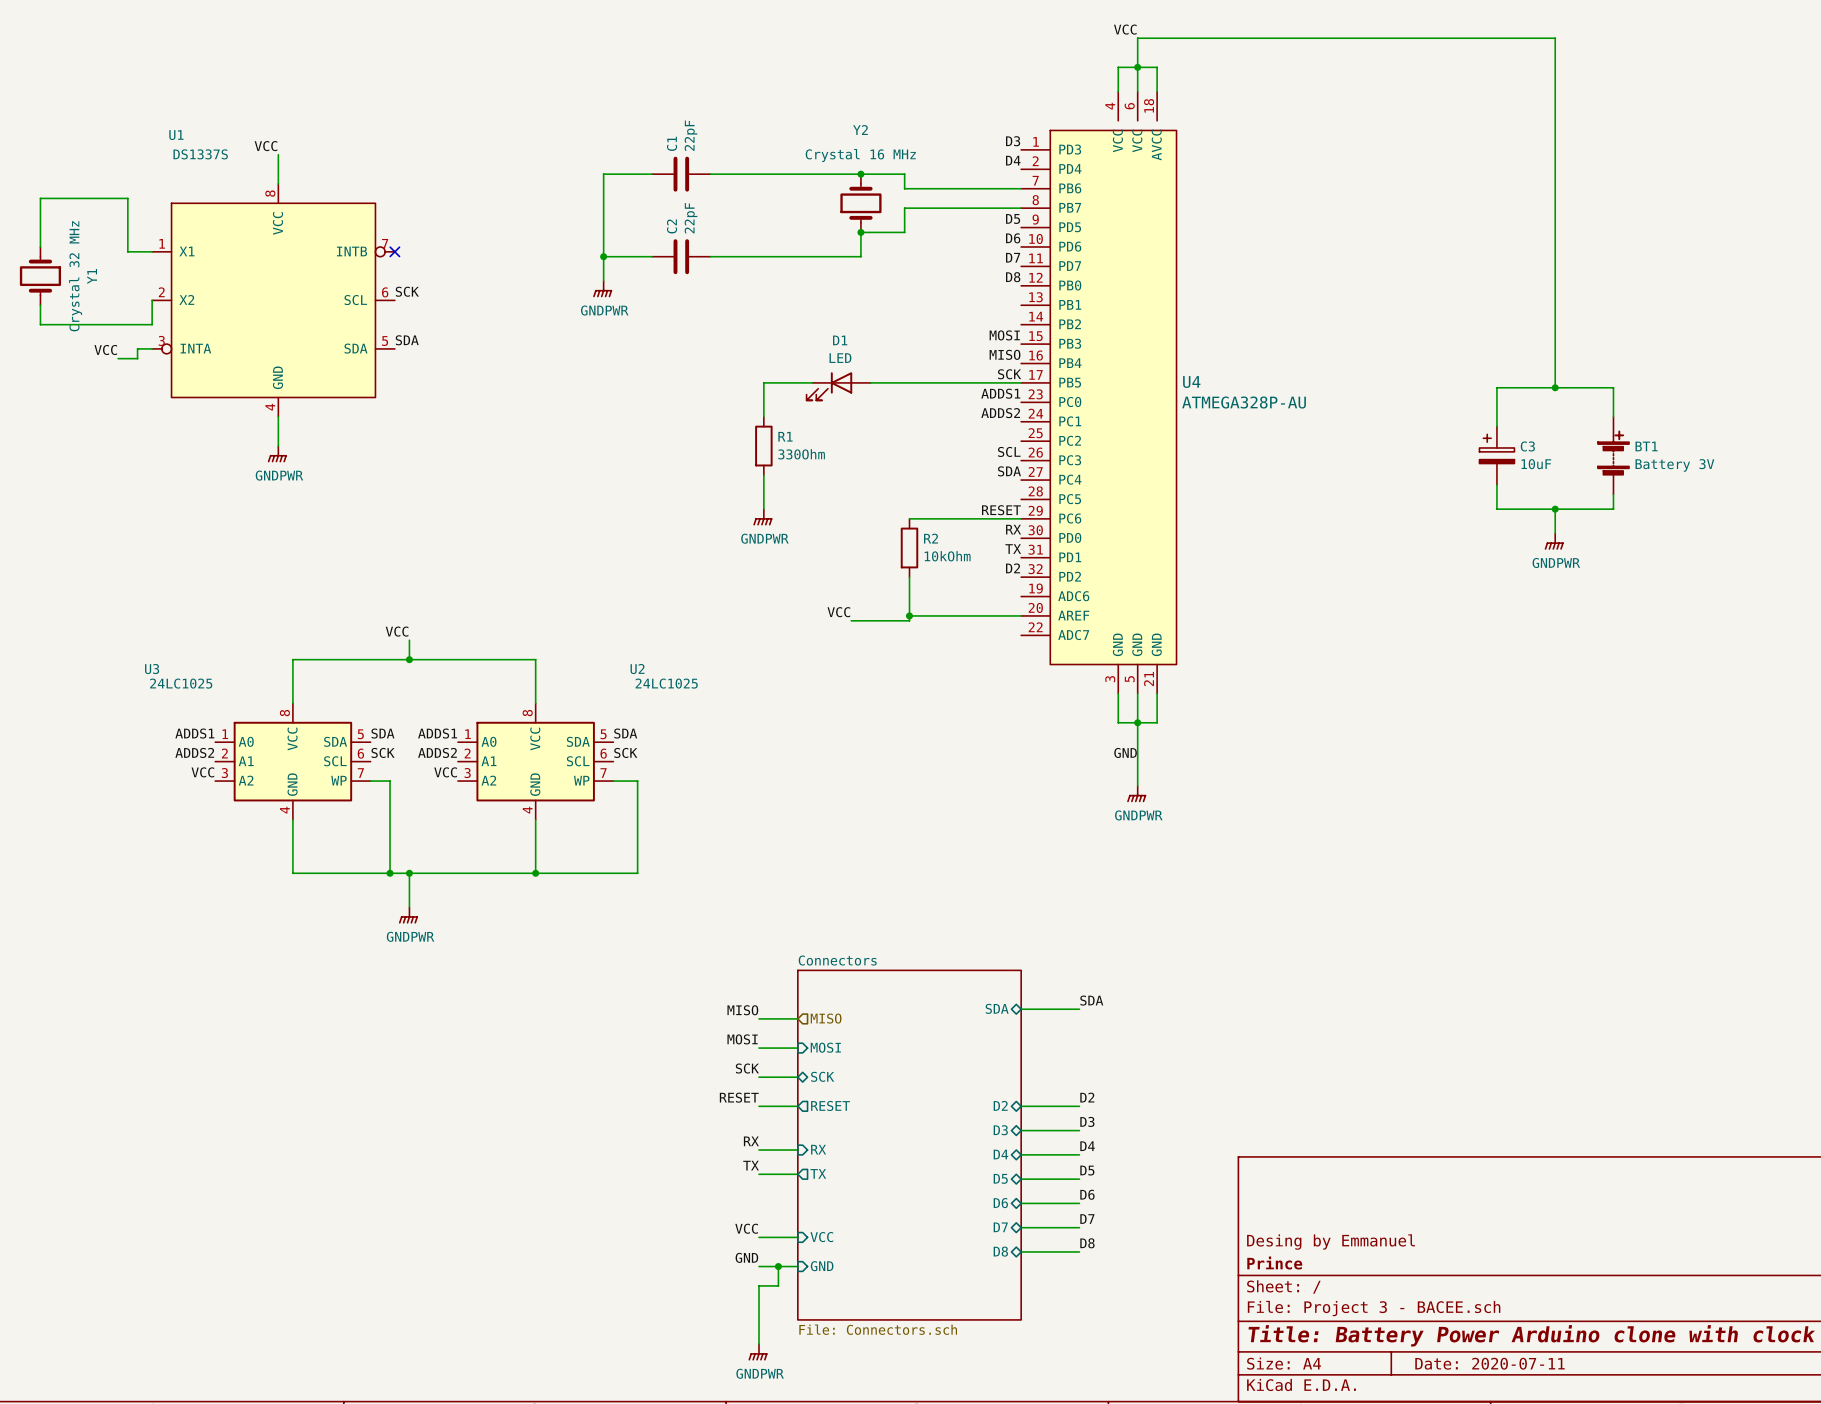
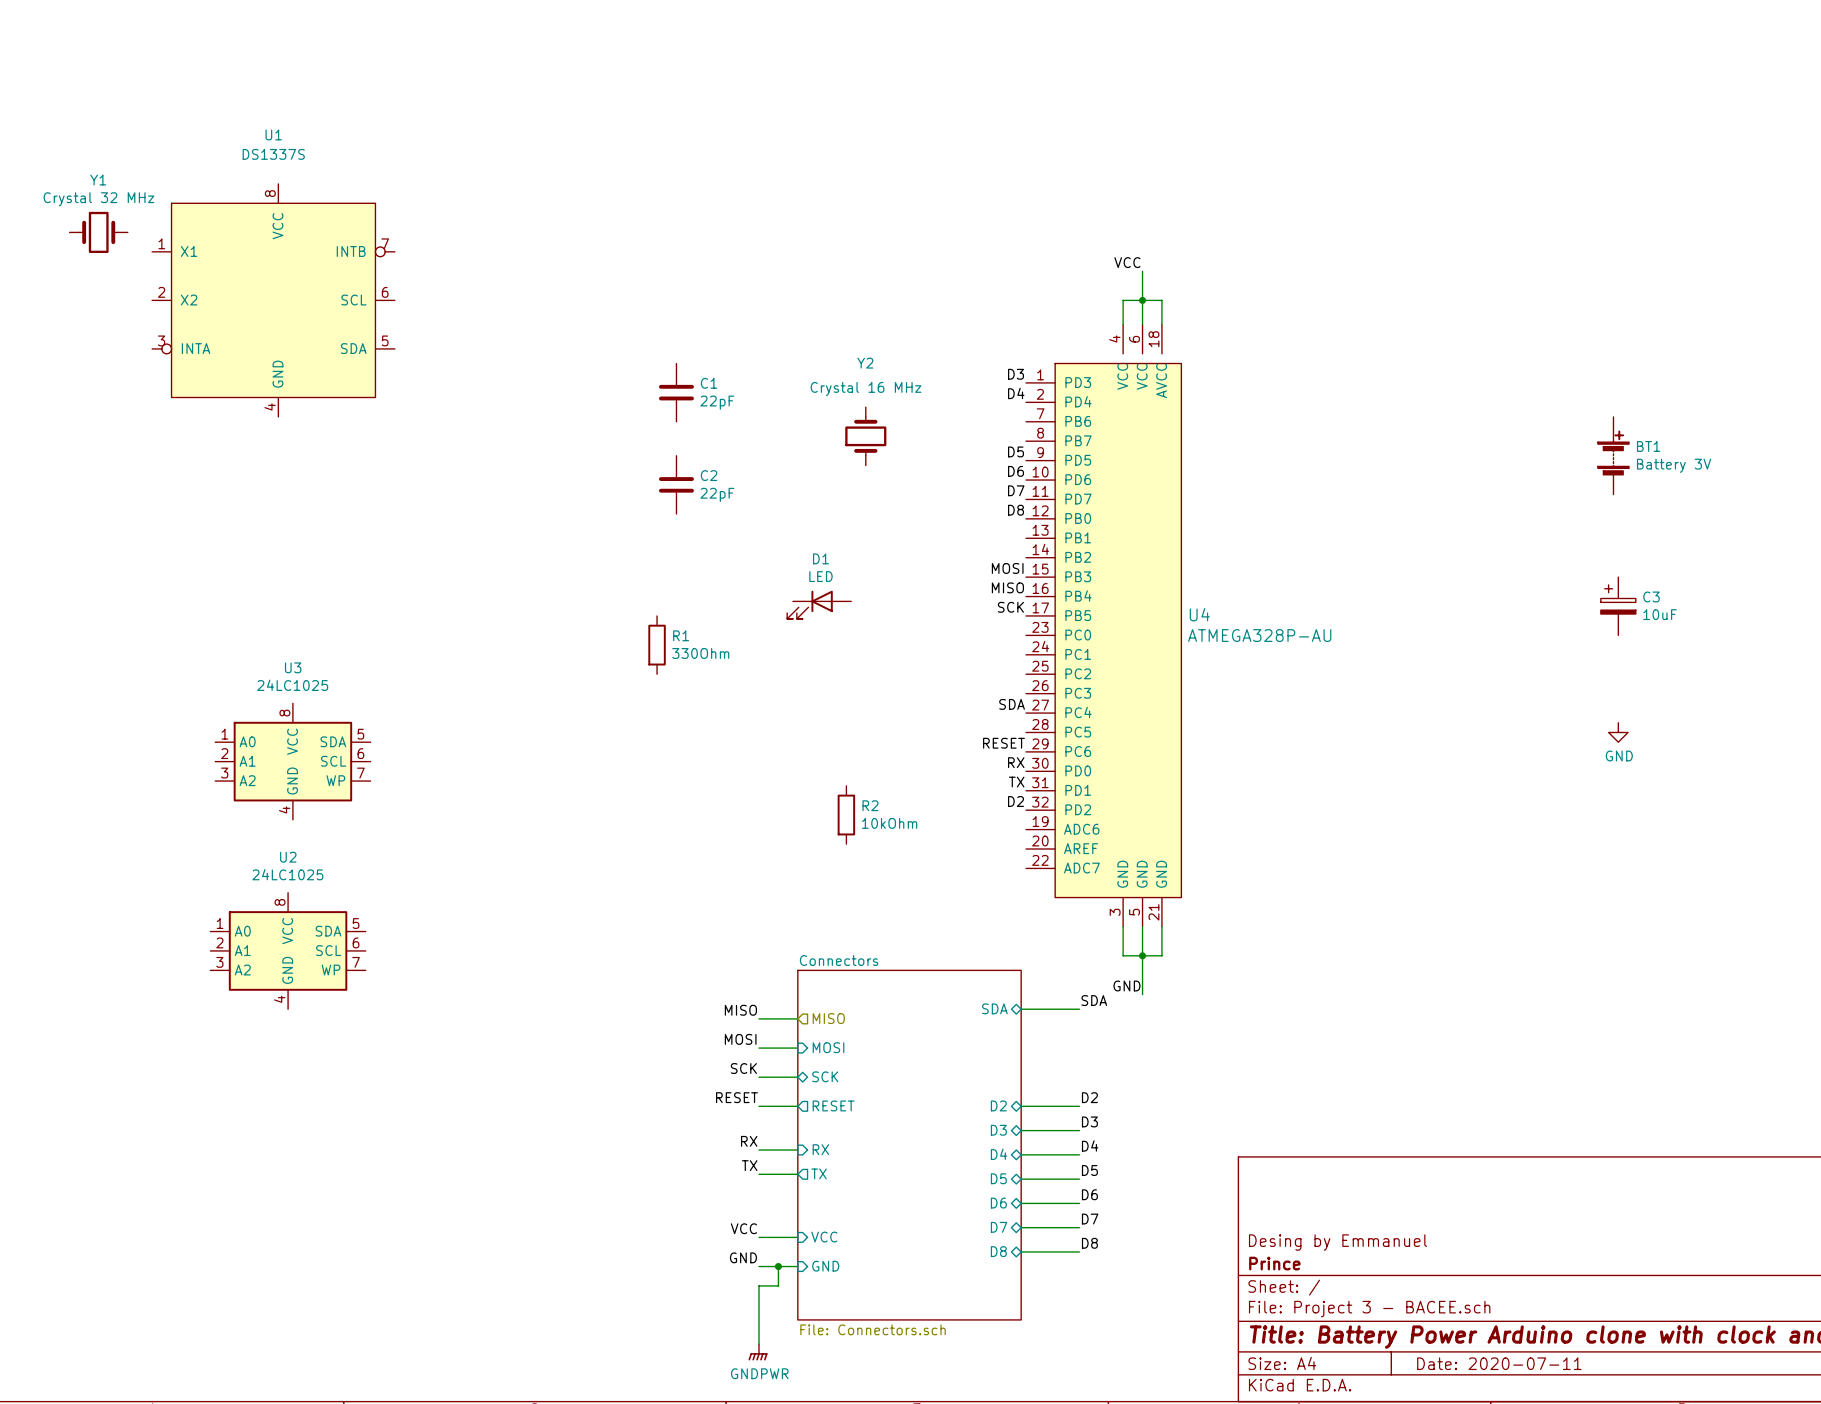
label: VCC (1125, 29) -> none
junction: (1137, 67) -> none
wire: (1118, 91) (1118, 67) (1157, 67) (1157, 91) -> none
wire: (1137, 91) (1137, 38) (1555, 38) (1555, 387) -> none
U1 name position: U1 (176, 135) -> U1 (273, 134)
label: D3 (1013, 141) -> none
label: VCC (265, 146) -> none
U1 value position: DS1337S (200, 154) -> DS1337S (273, 154)
wire: (278, 154) (278, 183) -> none
label: D4 (1013, 160) -> none
wire: (652, 174) (603, 174) (603, 280) -> none
C1 rotation: 0° (681, 174) -> 90° clockwise (676, 392)
C1 position: (681, 174) -> (676, 392)
wire: (710, 174) (904, 174) (904, 188) (1021, 188) -> none
junction: (860, 174) -> none
Y2 position: (860, 203) -> (865, 436)
wire: (1021, 208) (904, 208) (904, 232) (860, 232) (860, 256) (710, 256) -> none
label: D5 (1013, 219) -> none
junction: (860, 232) -> none
label: D6 (1013, 238) -> none
wire: (40, 246) (40, 198) (127, 198) (127, 251) (152, 251) -> none
no-connect mark: (394, 251) -> none
wire: (603, 256) (652, 256) -> none
junction: (603, 256) -> none
C2 rotation: 0° (681, 256) -> 90° clockwise (676, 484)
C2 position: (681, 256) -> (676, 484)
label: D7 (1013, 257) -> none
label: none -> VCC (1127, 262)
Y1 rotation: 0° (40, 276) -> 90° clockwise (98, 232)
Y1 position: (40, 276) -> (98, 232)
Y1 value position: Crystal 32 MHz (75, 276) -> Crystal 32 MHz (98, 199)
Y1 name position: Y1 (92, 276) -> Y1 (98, 180)
label: D8 (1013, 277) -> none
power symbol: GNDPWR (602, 289) -> none
label: SCK (407, 291) -> none
wire: (152, 300) (152, 324) (40, 324) (40, 305) -> none
junction: none -> (1142, 300)
label: MOSI (1004, 335) -> none
label: SDA (407, 340) -> none
wire: (152, 348) (137, 348) (137, 358) (118, 358) -> none
label: VCC (105, 349) -> none
label: MISO (1005, 354) -> none
label: SCK (1009, 374) -> D3 (1016, 374)
wire: (812, 382) (763, 382) (763, 416) -> none
wire: (870, 382) (1021, 382) -> none
D1 position: (838, 386) -> (819, 604)
junction: (1555, 387) -> none
U4 position: (1098, 392) -> (1103, 625)
label: ADDS1 (1000, 393) -> D4 (1016, 393)
label: ADDS2 (1000, 413) -> none
wire: (278, 416) (278, 446) -> none
wire: (1613, 416) (1613, 387) (1496, 387) (1496, 426) -> none
R1 position: (763, 446) -> (657, 645)
label: SCL (1009, 451) -> D5 (1016, 451)
power symbol: GNDPWR (277, 454) -> none
C3 position: (1496, 455) -> (1618, 606)
label: SDA (1009, 471) -> D6 (1016, 471)
wire: (763, 475) (763, 509) -> none
wire: (1496, 484) (1496, 509) (1613, 509) (1613, 494) -> none
label: none -> D7 (1016, 490)
wire: (1555, 509) (1555, 533) -> none
junction: (1555, 509) -> none
label: RESET (1001, 510) -> D8 (1016, 510)
power symbol: GNDPWR (762, 517) -> none
wire: (909, 518) (1021, 518) -> none
label: RX (1013, 529) -> none
power symbol: GNDPWR (1554, 541) -> none
R2 position: (909, 548) -> (846, 815)
label: TX (1013, 549) -> none
label: D2 (1013, 568) -> MOSI (1007, 568)
wire: (909, 577) (909, 620) (851, 620) -> none
label: none -> MISO (1007, 587)
label: none -> SCK (1010, 607)
label: VCC (838, 612) -> none
wire: (909, 615) (1021, 615) -> none
junction: (909, 615) -> none
label: VCC (397, 631) -> none
wire: (409, 640) (409, 659) -> none
junction: (409, 659) -> none
U3 name position: U3 (152, 669) -> U3 (293, 667)
U2 name position: U2 (637, 669) -> U2 (288, 857)
U3 value position: 24LC1025 (181, 683) -> 24LC1025 (292, 685)
U2 value position: 24LC1025 (666, 683) -> 24LC1025 (287, 874)
wire: (292, 703) (292, 659) (535, 659) (535, 703) -> none
label: none -> SDA (1012, 704)
junction: (1137, 722) -> none
power symbol: none -> GND (1618, 732)
label: ADDS1 (194, 733) -> none
label: SDA (382, 733) -> none
label: ADDS1 (437, 733) -> none
label: SDA (625, 733) -> none
label: none -> RESET (1003, 743)
label: ADDS2 (194, 752) -> none
label: SCK (383, 752) -> none
label: ADDS2 (437, 752) -> none
label: SCK (625, 752) -> none
label: GND (1125, 752) -> none
U2 position: (535, 761) -> (288, 950)
label: none -> RX (1016, 762)
label: VCC (202, 772) -> none
label: VCC (445, 772) -> none
wire: (370, 781) (390, 781) (390, 873) -> none
wire: (613, 781) (637, 781) (637, 873) (292, 873) (292, 819) -> none
label: none -> TX (1016, 782)
power symbol: GNDPWR (1136, 794) -> none
label: none -> D2 (1016, 801)
wire: (535, 819) (535, 873) -> none
junction: (390, 873) -> none
wire: (409, 873) (409, 907) -> none
junction: (409, 873) -> none
junction: (535, 873) -> none
power symbol: GNDPWR (408, 915) -> none
wire: none -> (1123, 926) (1123, 955) (1161, 955) (1161, 926)
wire: none -> (1142, 926) (1142, 994)
junction: none -> (1142, 955)
label: none -> GND (1126, 985)

